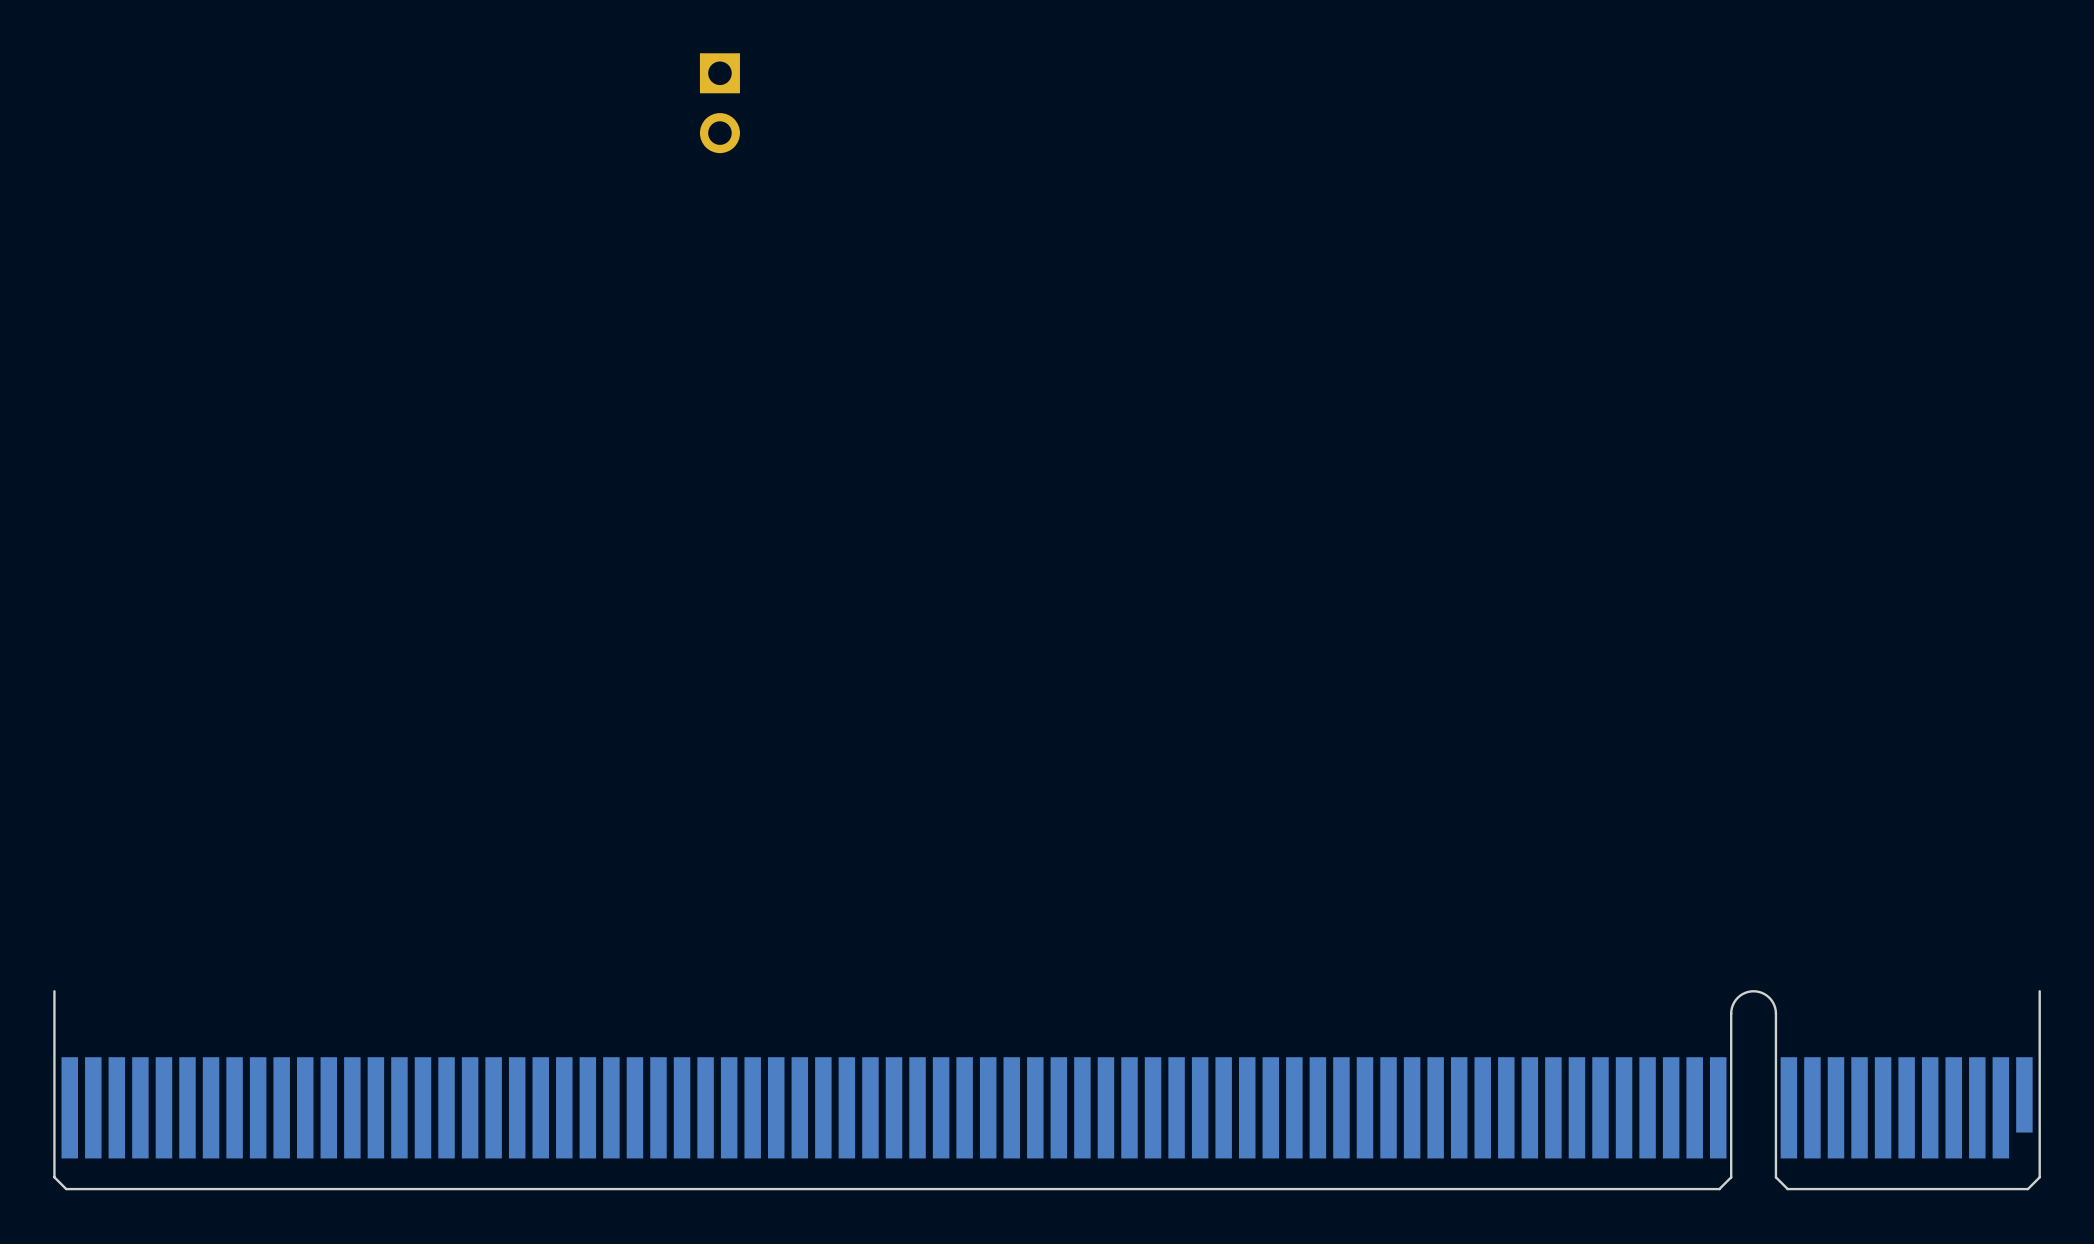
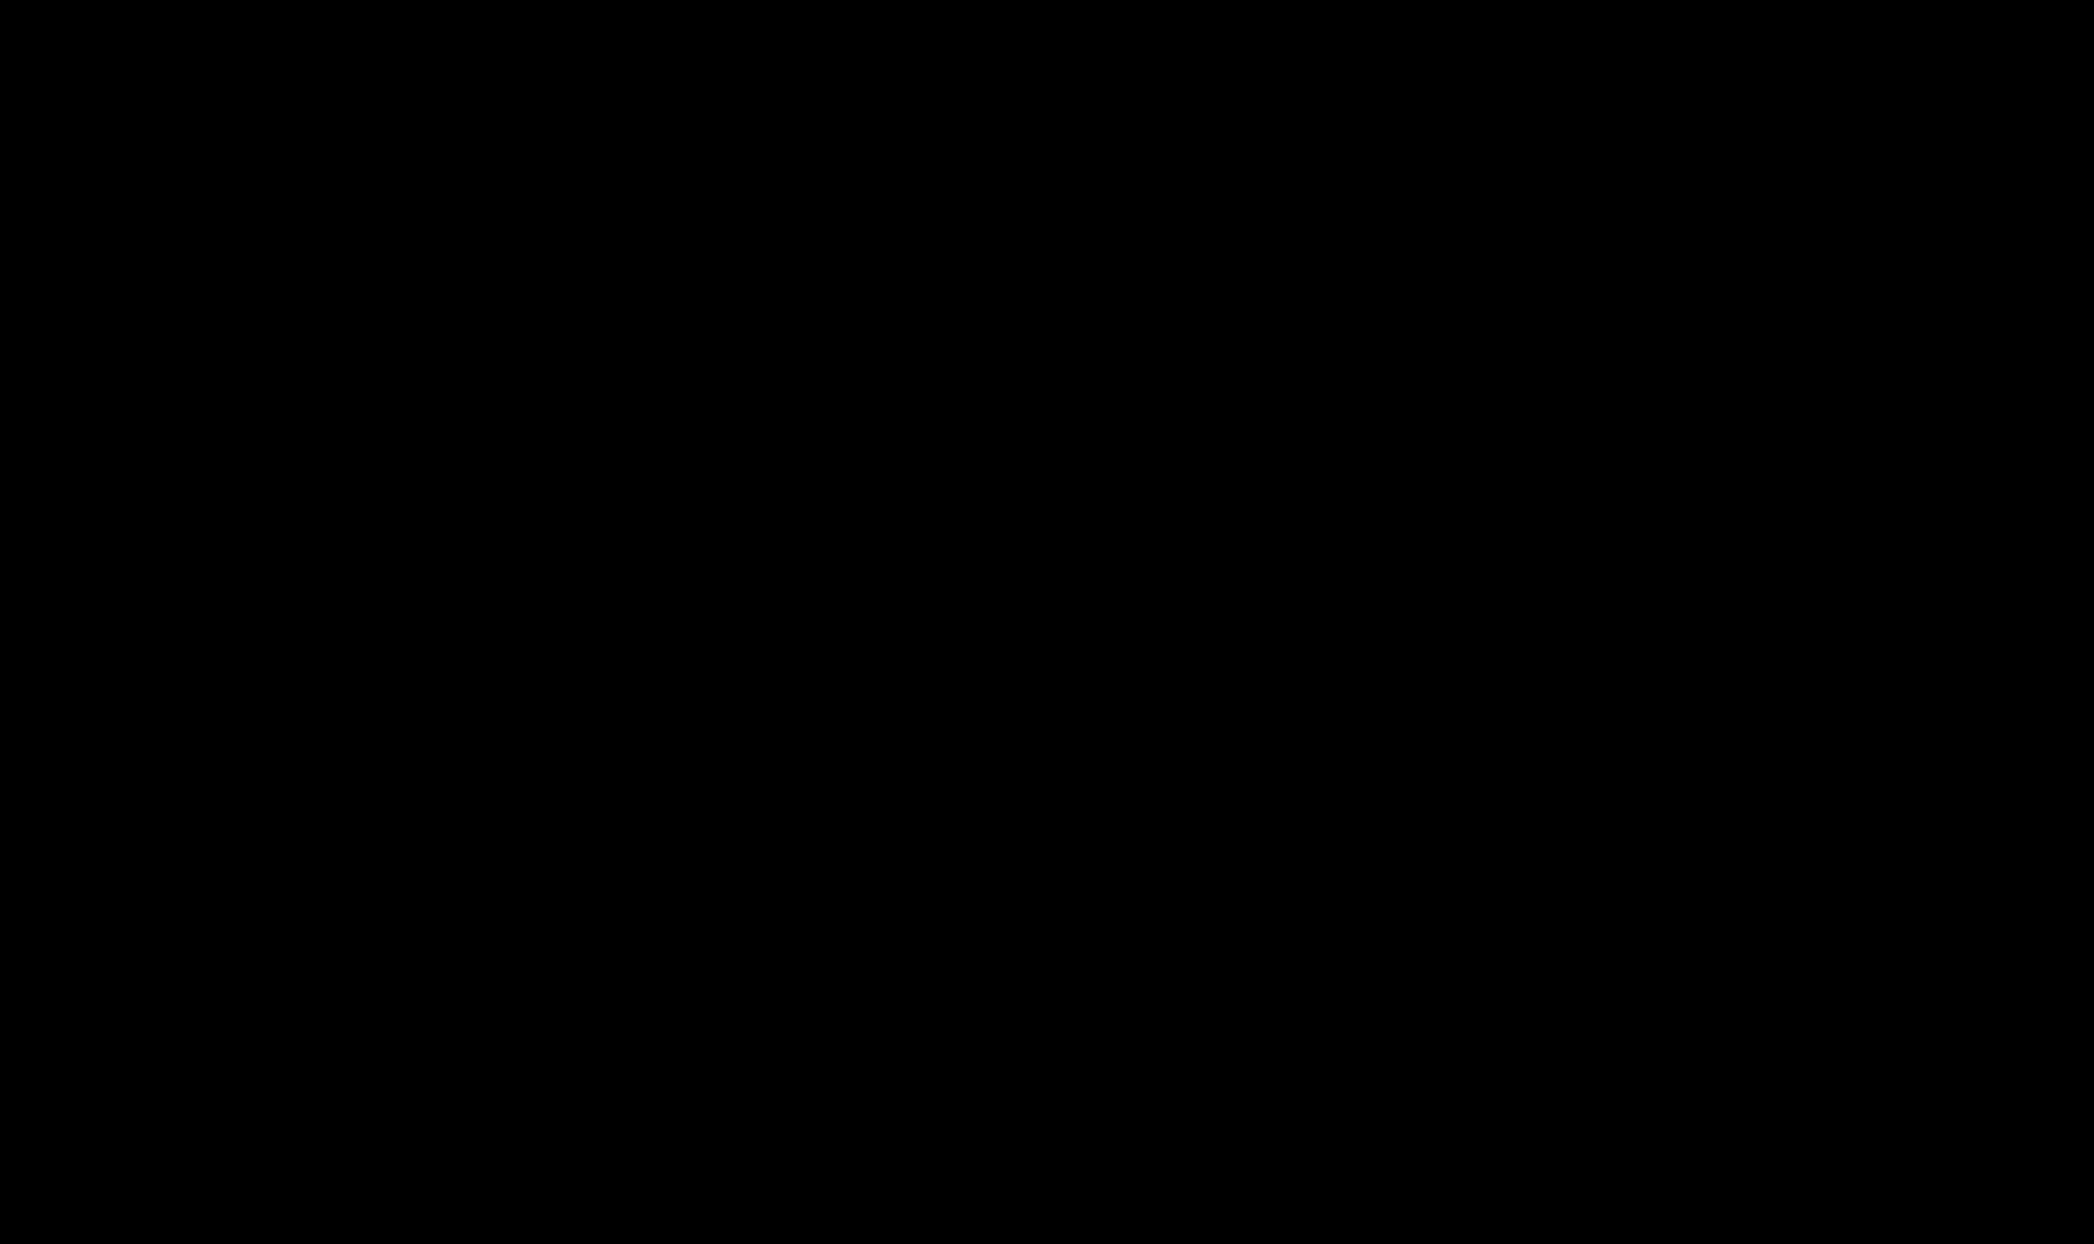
part: (719, 103) -> none
part: (1047, 1090) -> none

